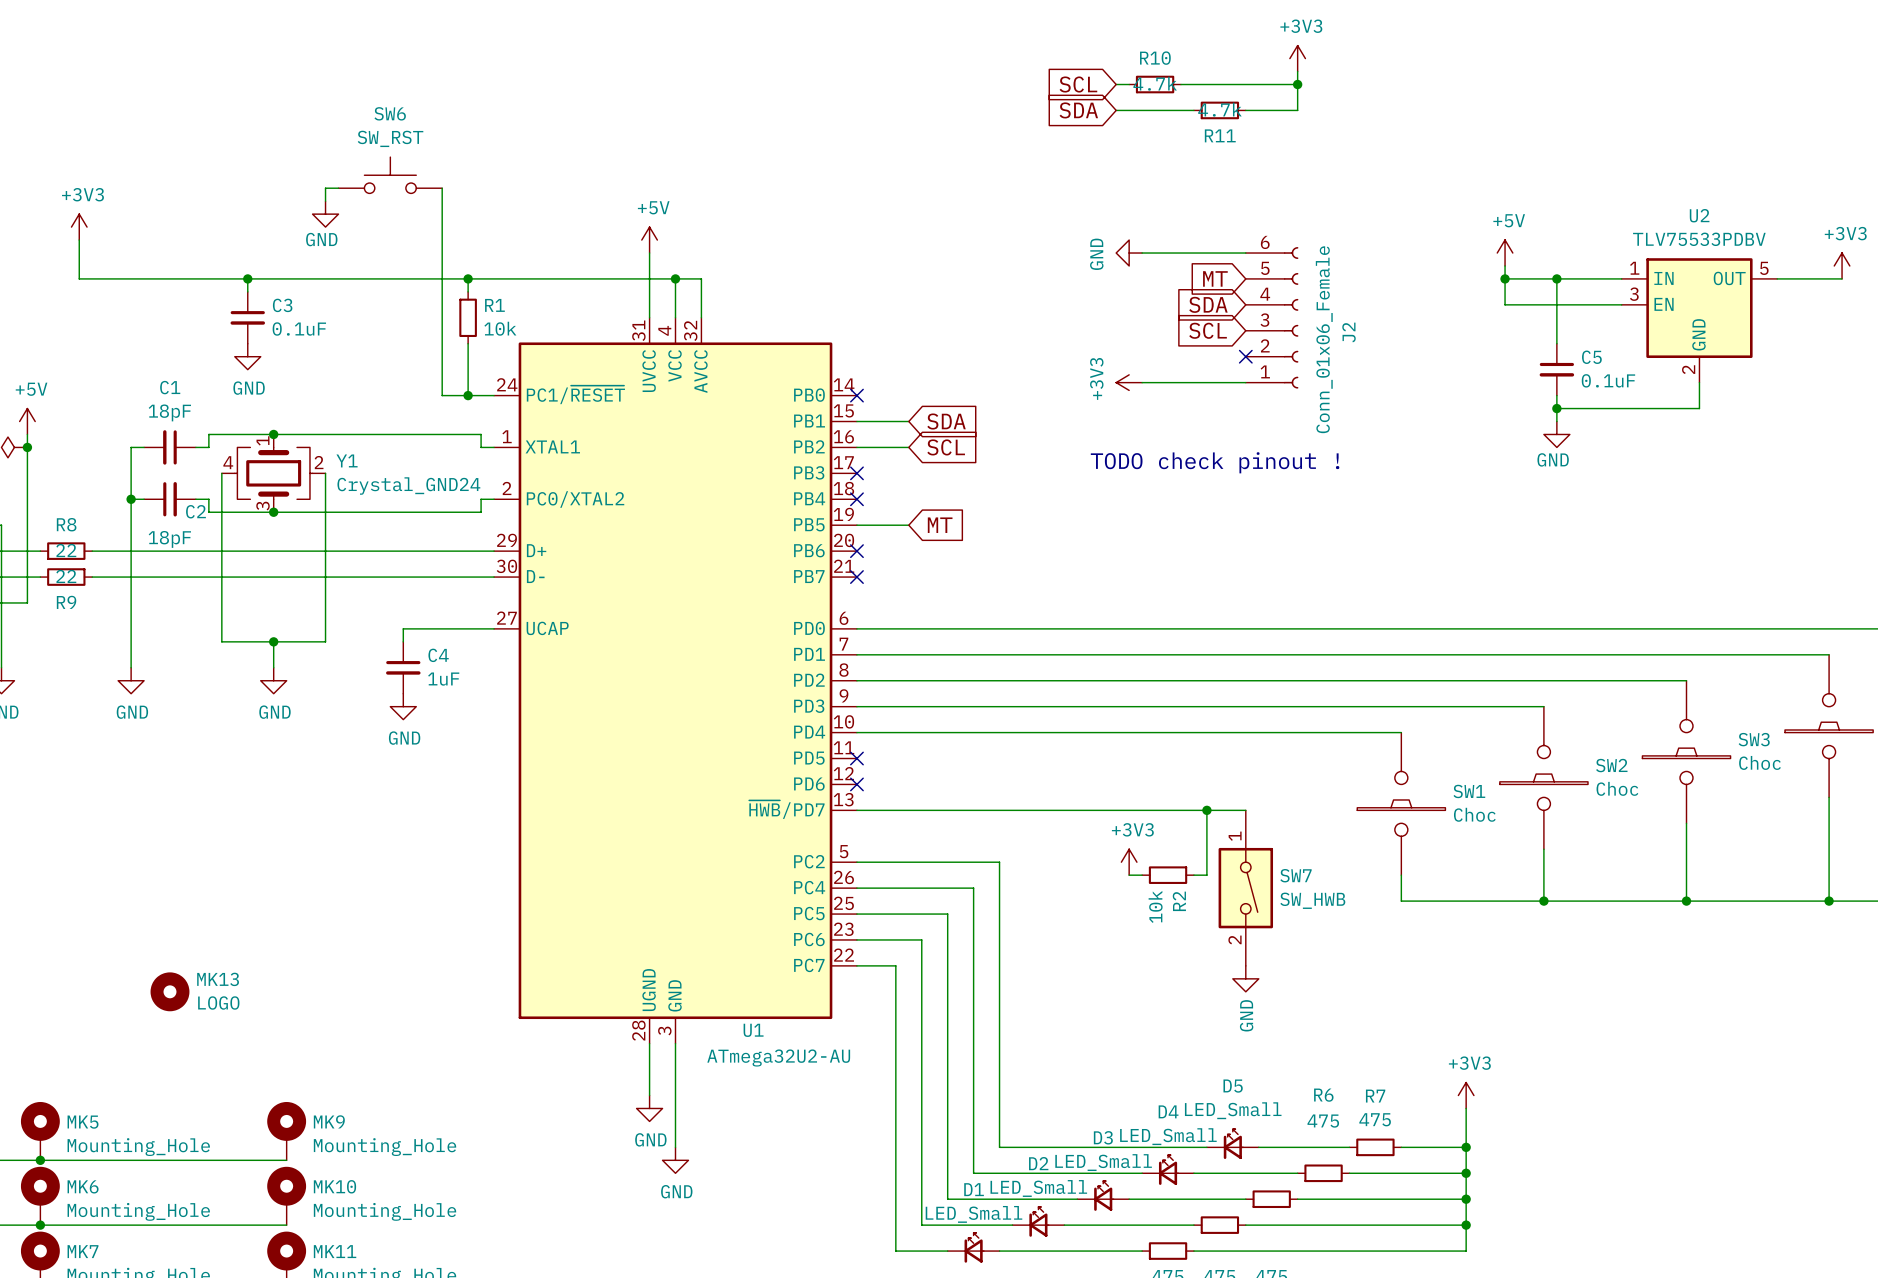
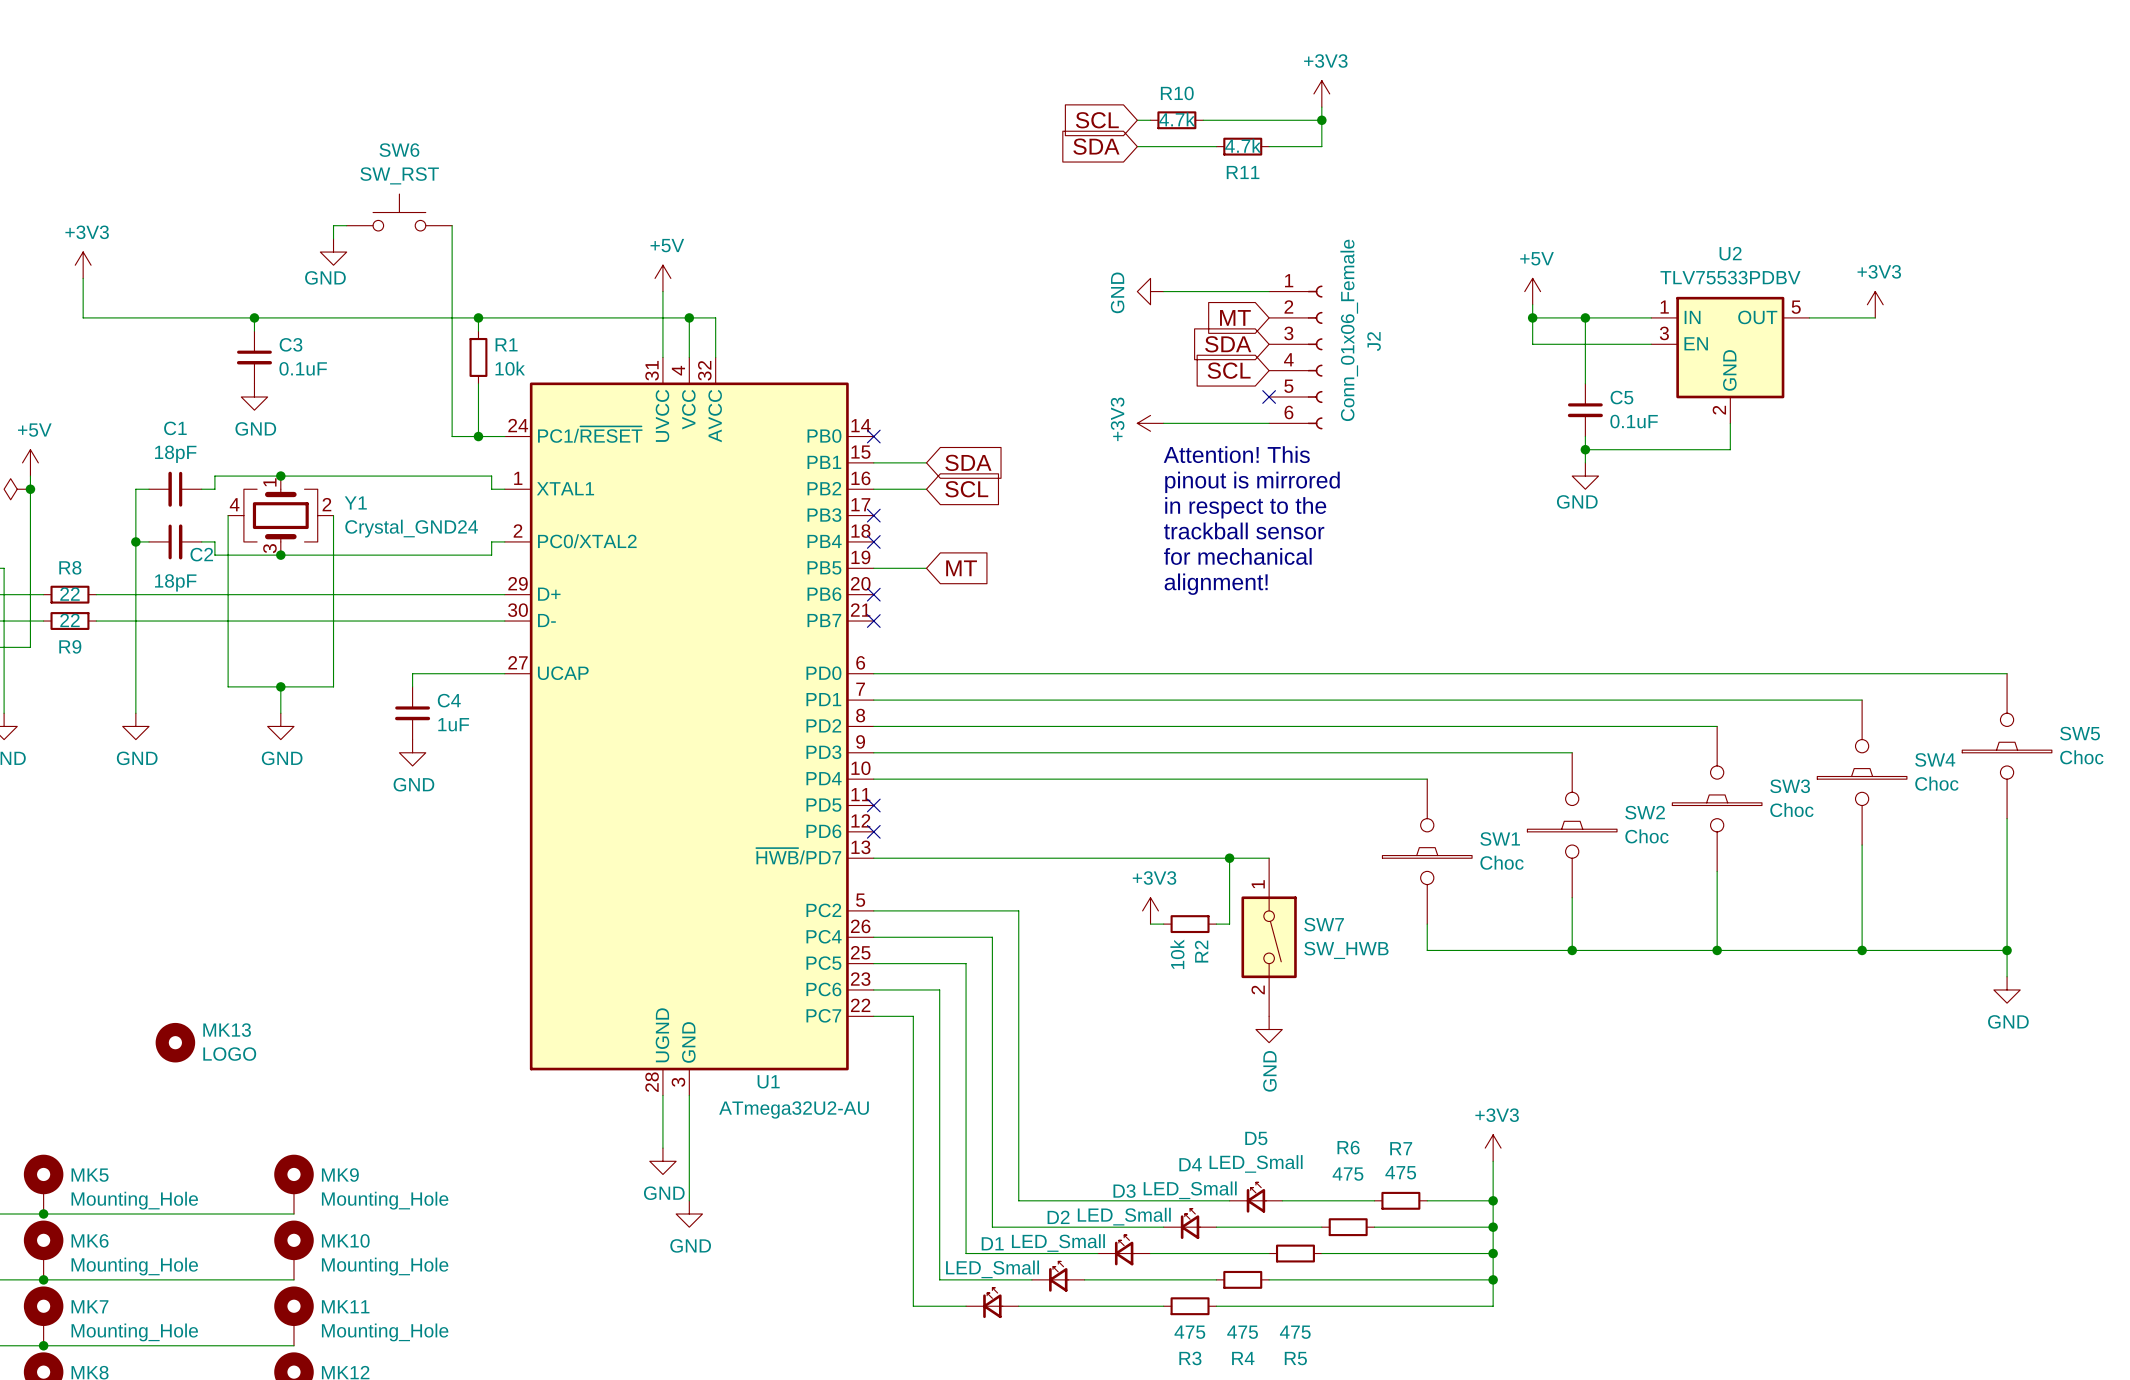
J2 flip: as is (1291, 317) -> up-down (1315, 357)
text: none -> Attention! This (1236, 454)
text: none -> pinout is mirrored (1252, 482)
text: TODO check pinout ! (1215, 462) -> none
text: none -> in respect to the (1245, 507)
text: none -> trackball sensor (1244, 531)
text: none -> for mechanical (1237, 556)
text: none -> alignment! (1216, 584)

